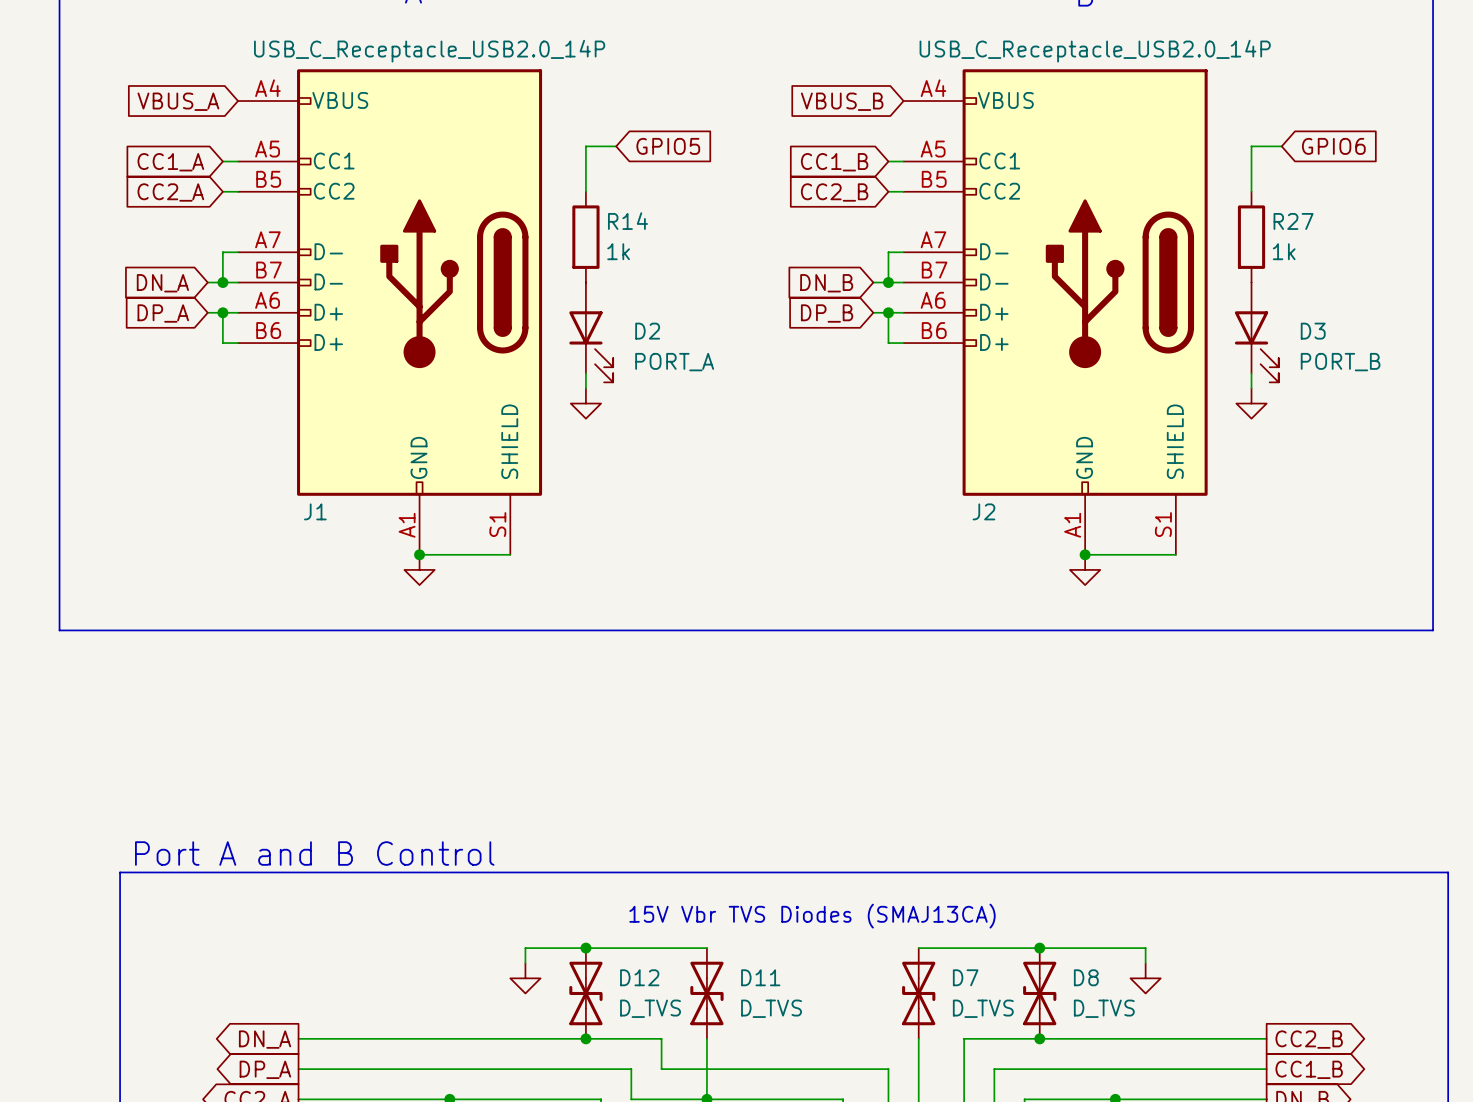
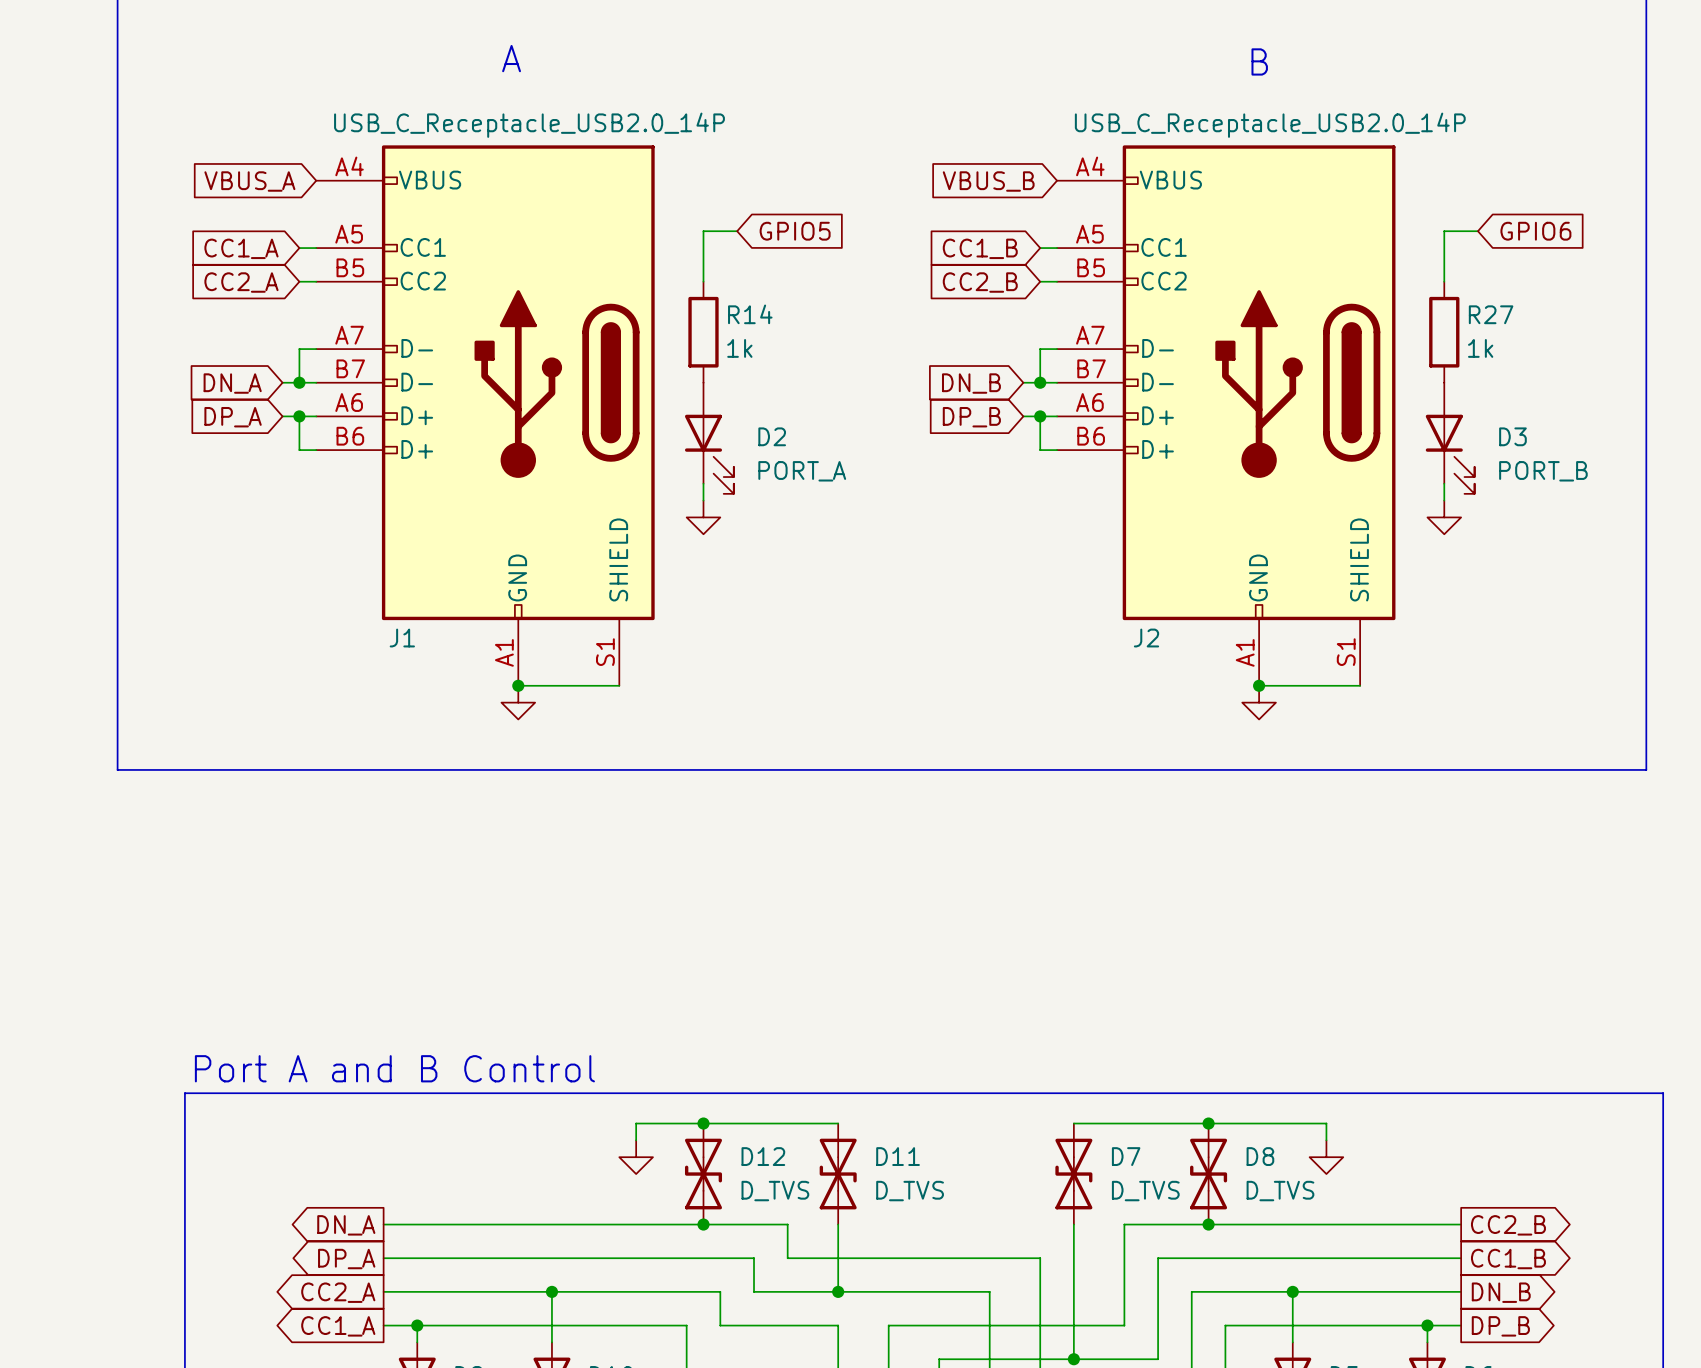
text position: Port A and B Control (314, 853) -> Port A and B Control (394, 1068)
text: 15V Vbr TVS Diodes (SMAJ13CA) (812, 916) -> none
line: (120, 920) (120, 872) (1448, 872) (1448, 920) -> (184, 1093) (1663, 1093)

